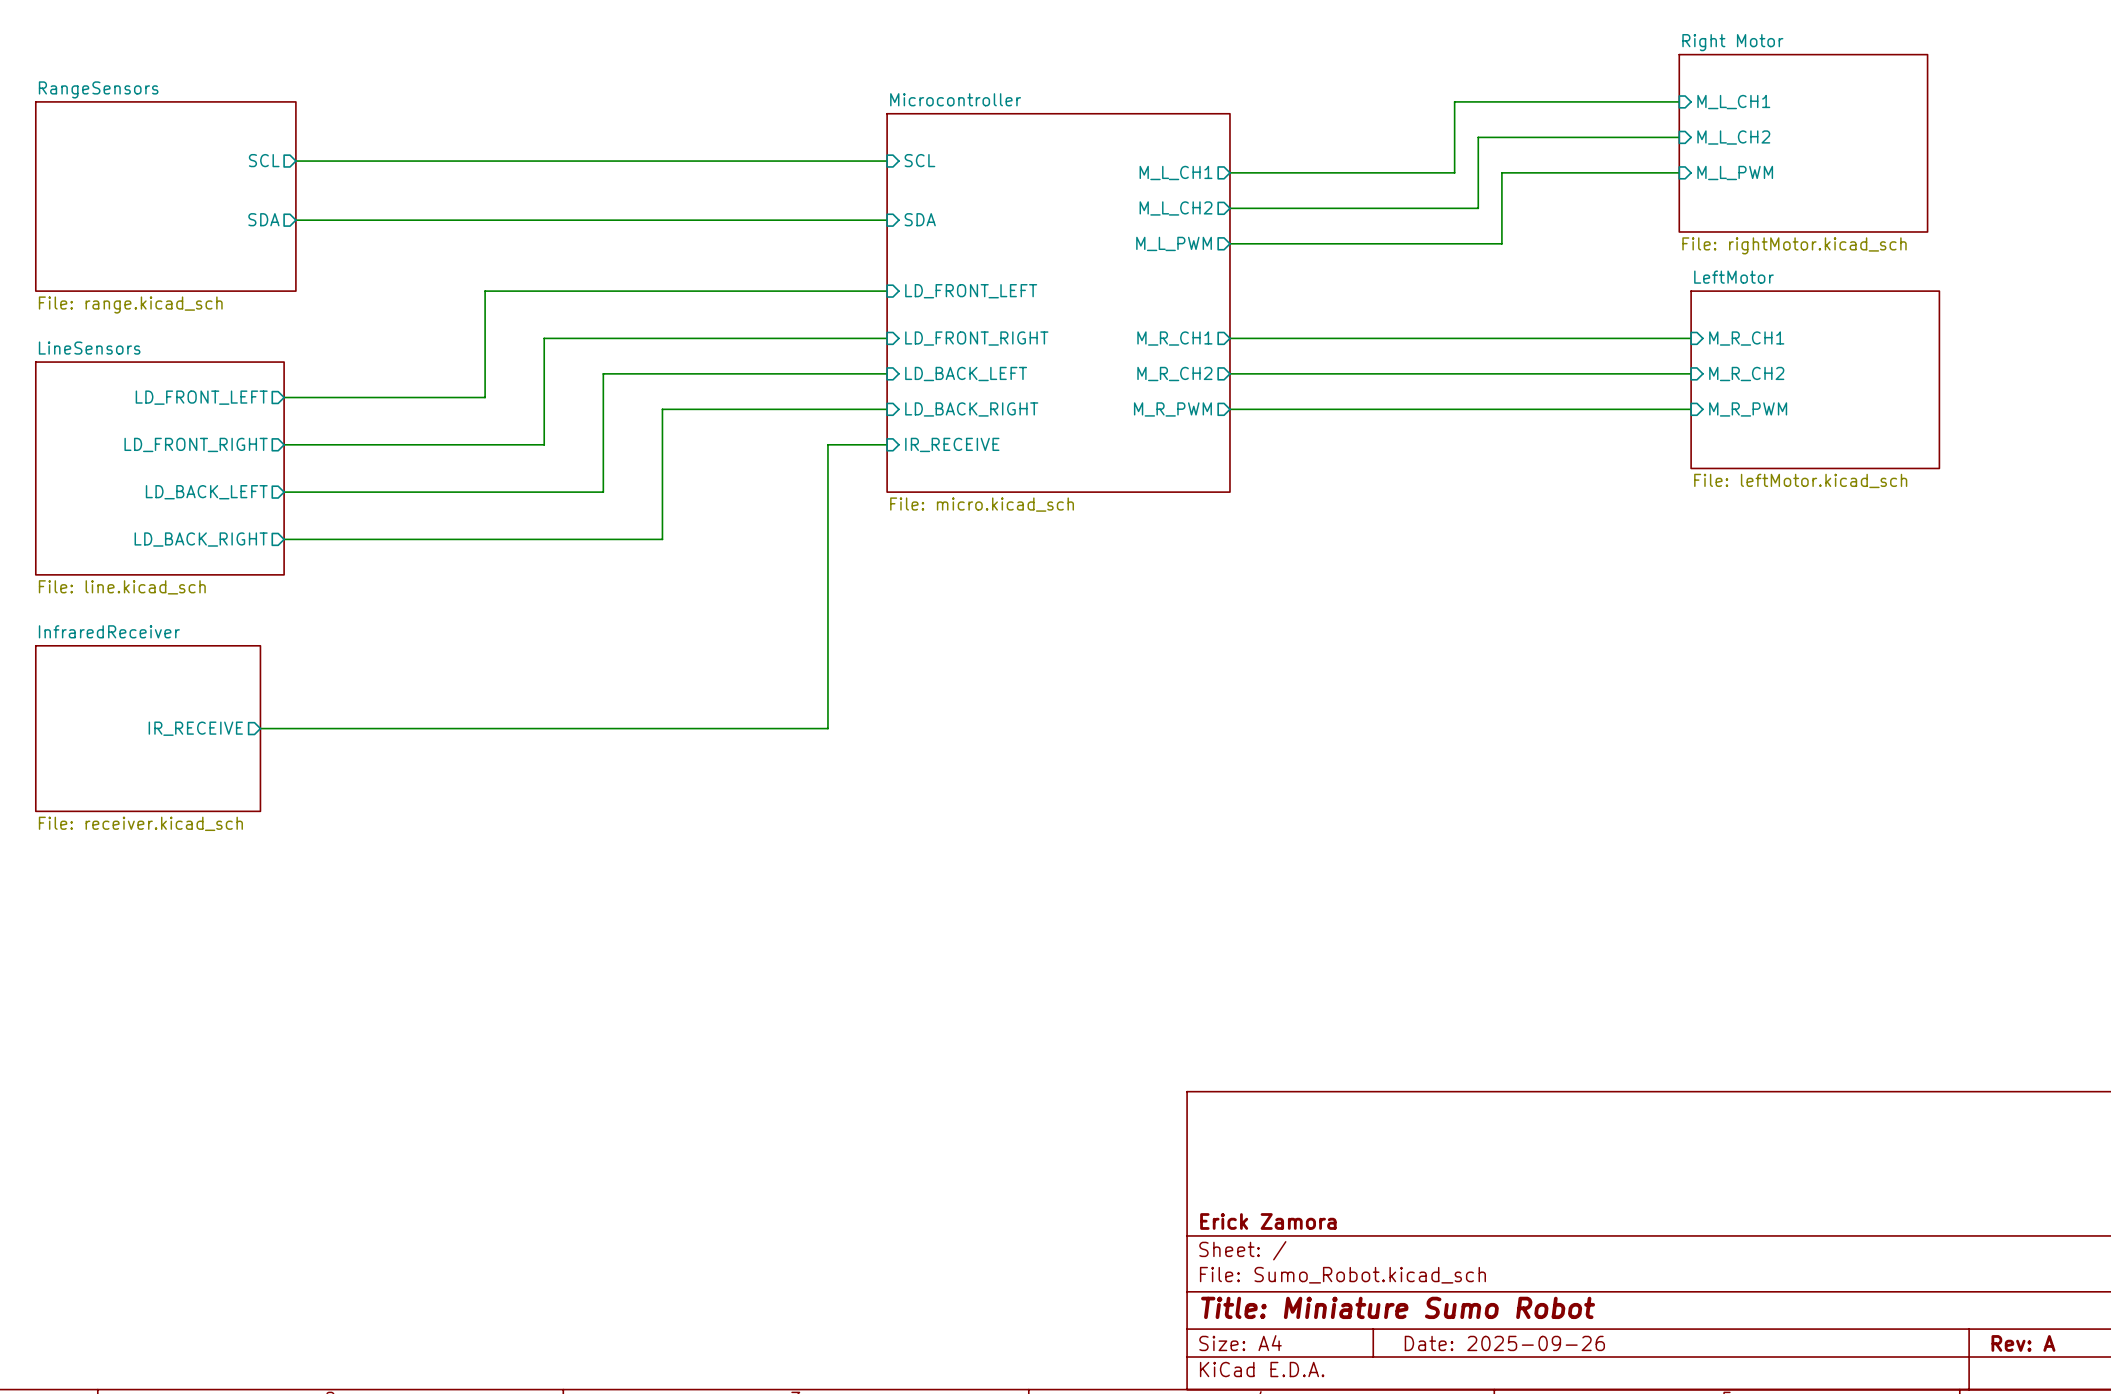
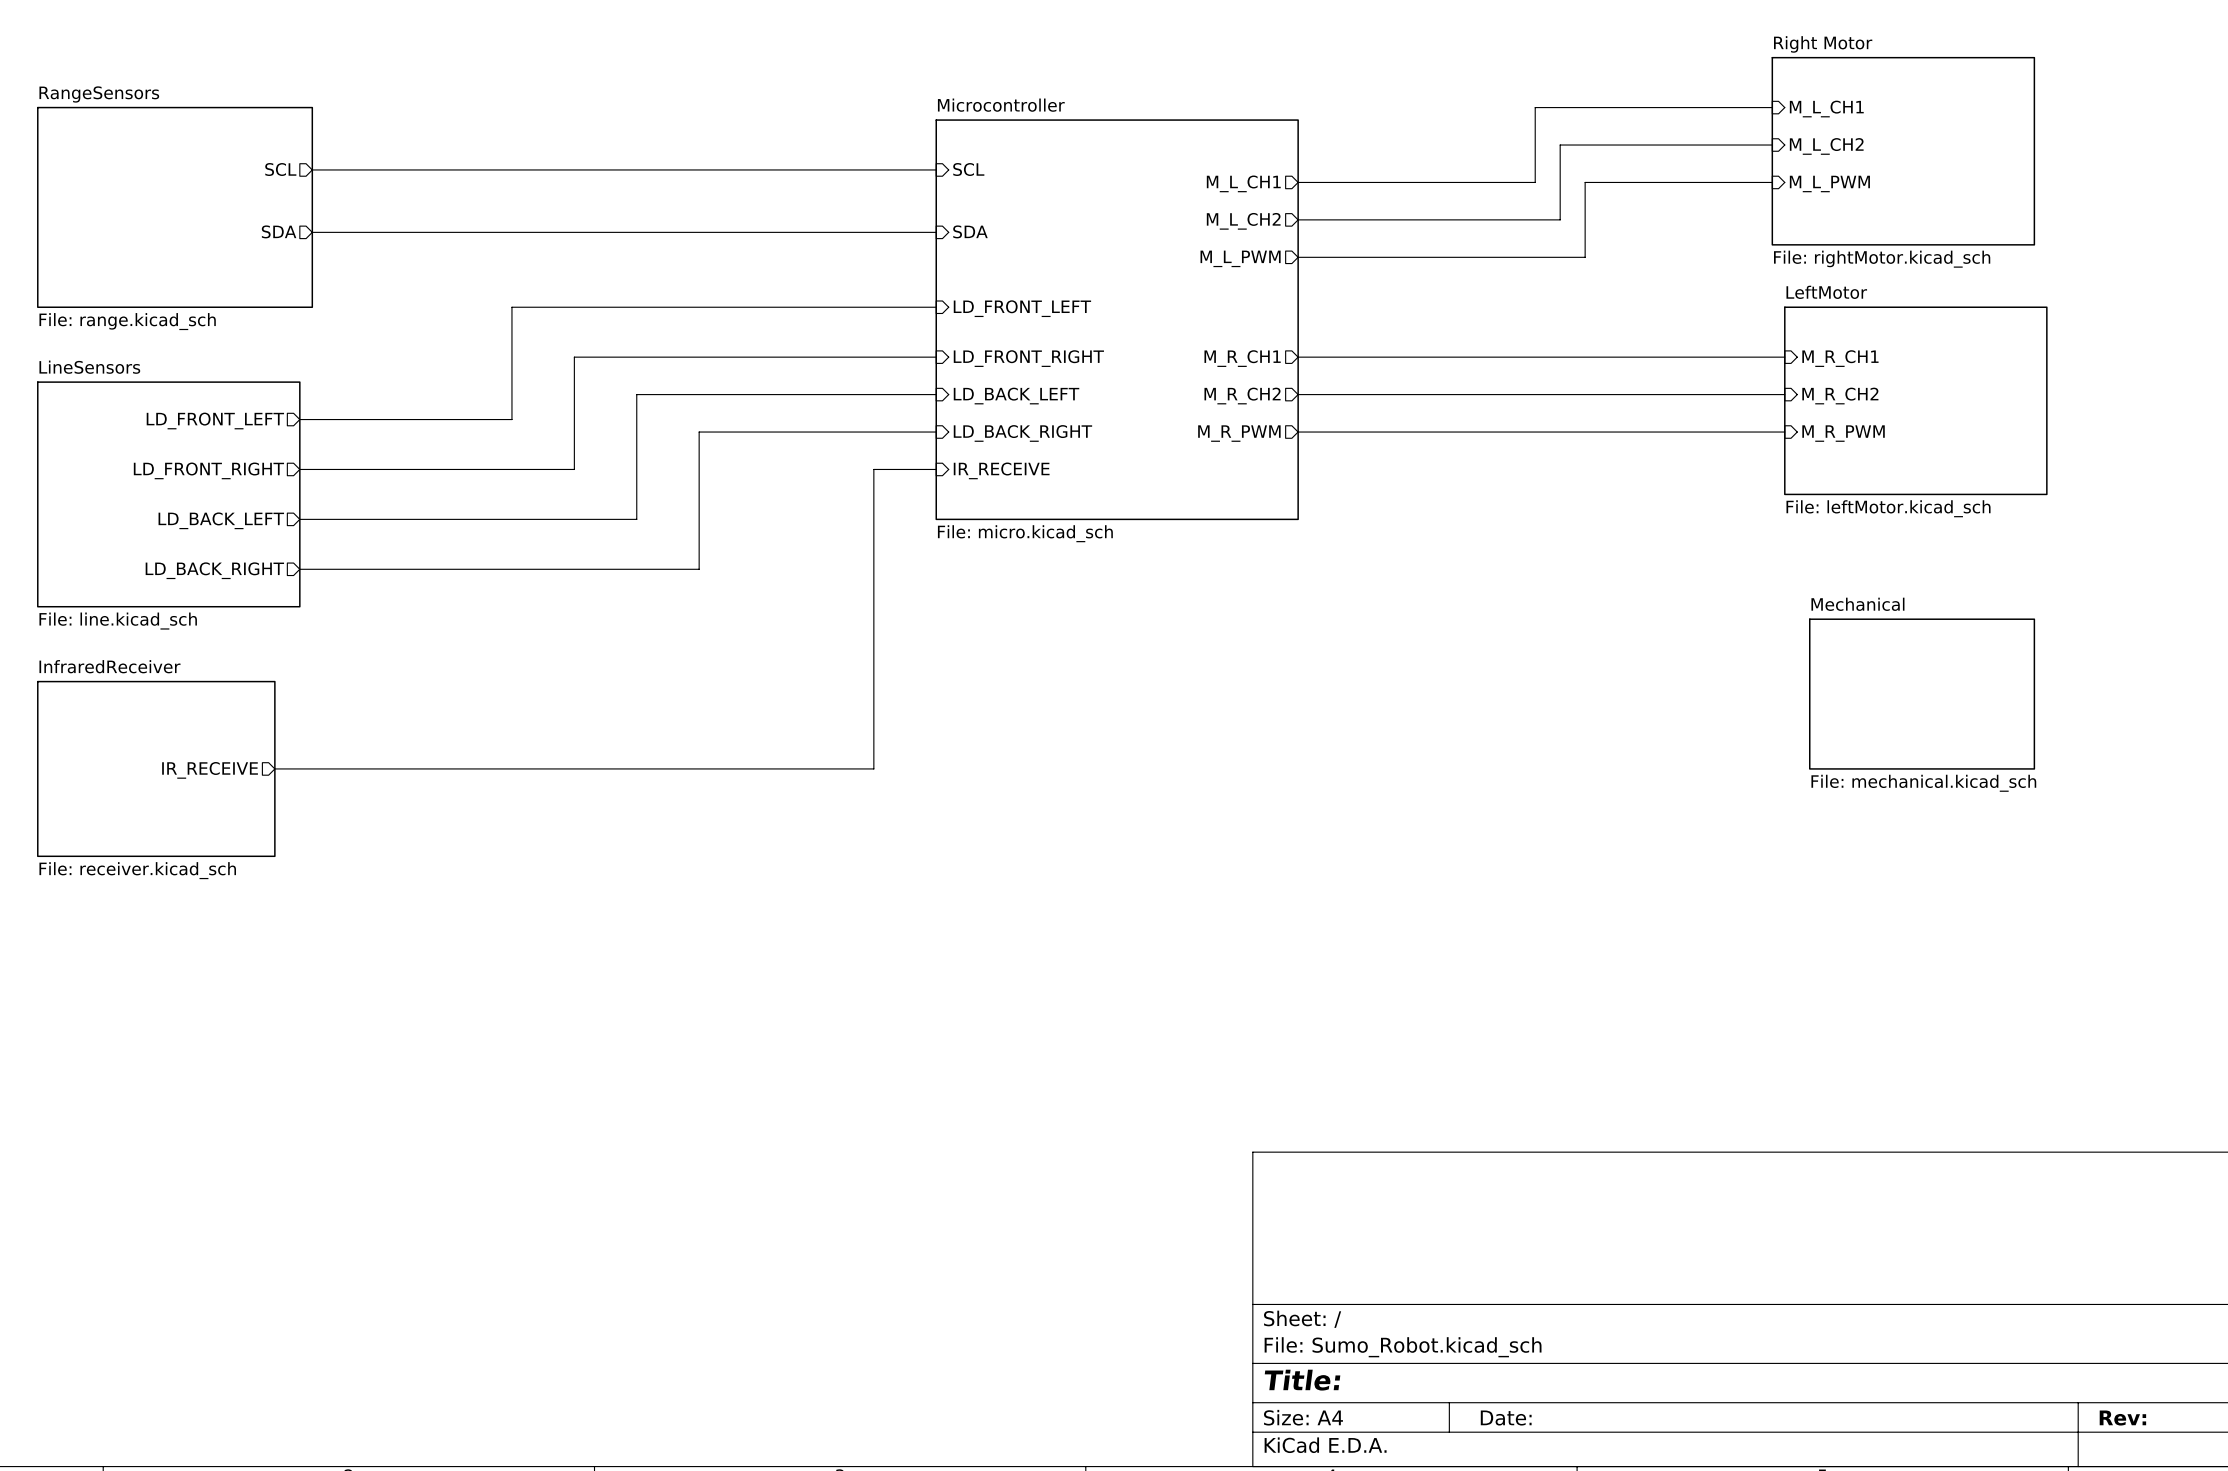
sheet Mechanical: none -> File: mechanical.kicad_sch (1922, 694)
title block: Erick Zamora (1268, 1221) -> none
title block: Title: Miniature Sumo Robot (1398, 1307) -> Title: (1302, 1380)
title block: Date: 2025-09-26 (1504, 1343) -> Date: (1506, 1418)
title block: Rev: A (2023, 1343) -> Rev: (2122, 1418)

